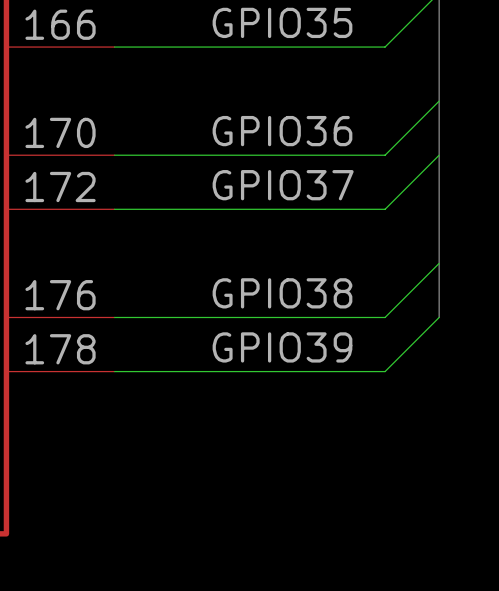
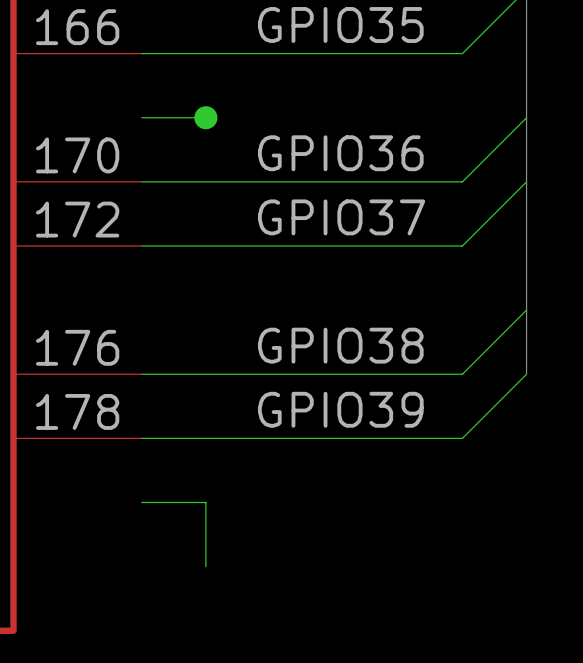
wire: none -> (141, 117) (205, 117)
junction: none -> (205, 117)
wire: none -> (141, 502) (205, 502) (205, 566)

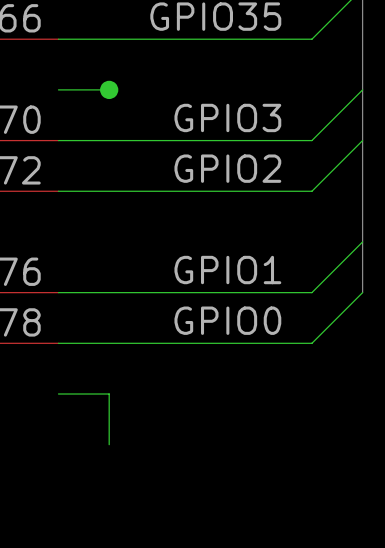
label: GPIO36 (340, 153) -> GPIO3 (227, 117)
label: GPIO37 (341, 217) -> GPIO2 (227, 168)
label: GPIO38 (340, 345) -> GPIO1 (227, 270)
label: GPIO39 (340, 409) -> GPIO0 (227, 320)

